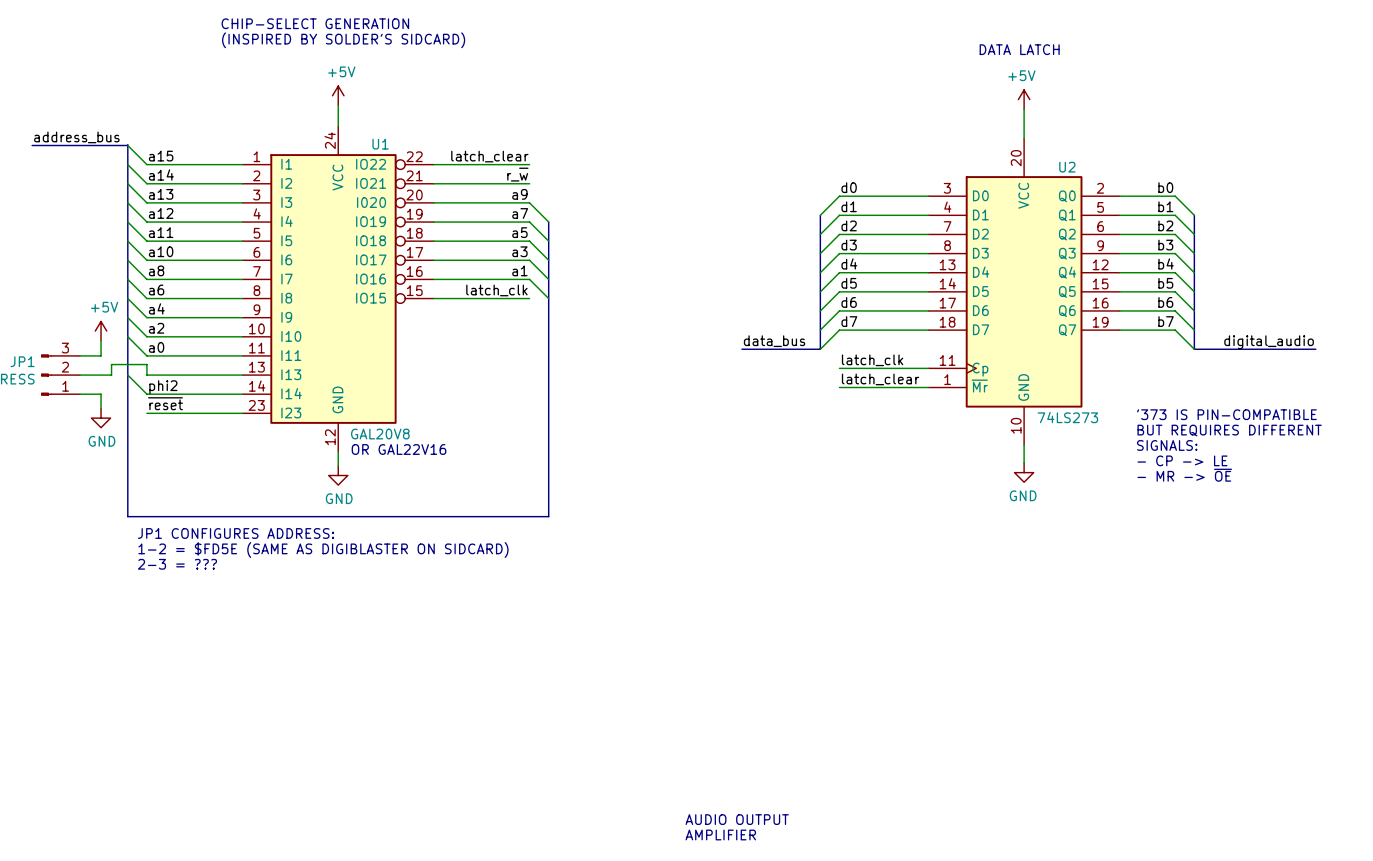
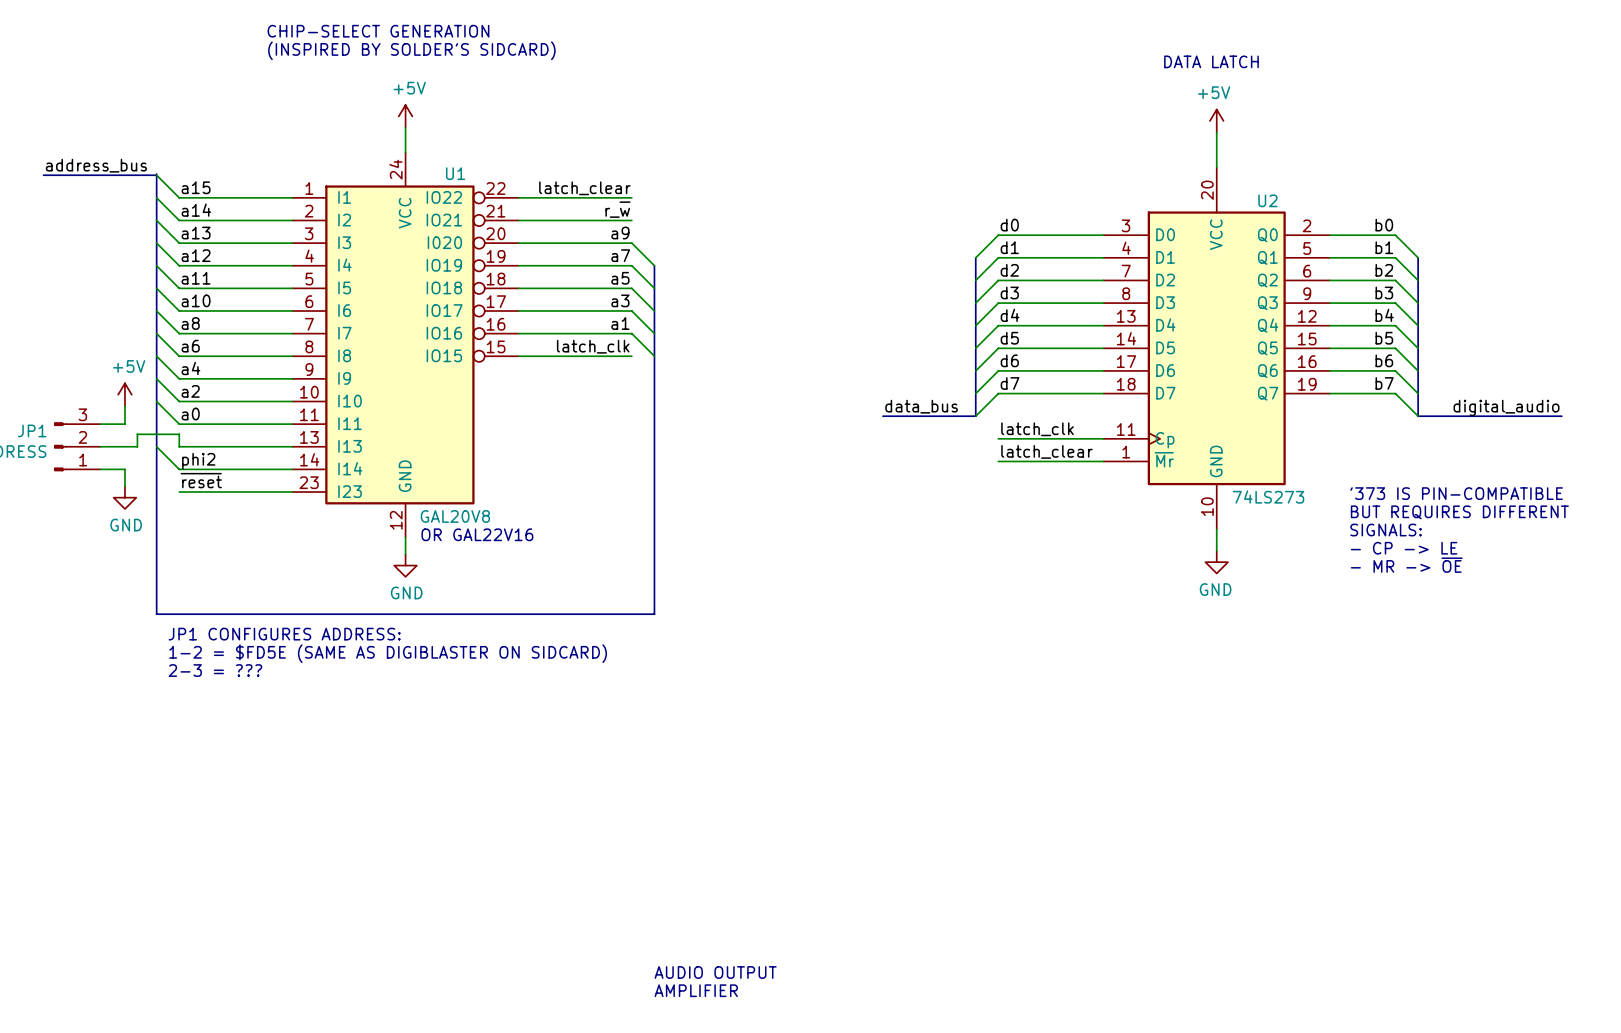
text position: AUDIO OUTPUT (737, 819) -> AUDIO OUTPUT (715, 972)
text position: AMPLIFIER (720, 834) -> AMPLIFIER (696, 990)

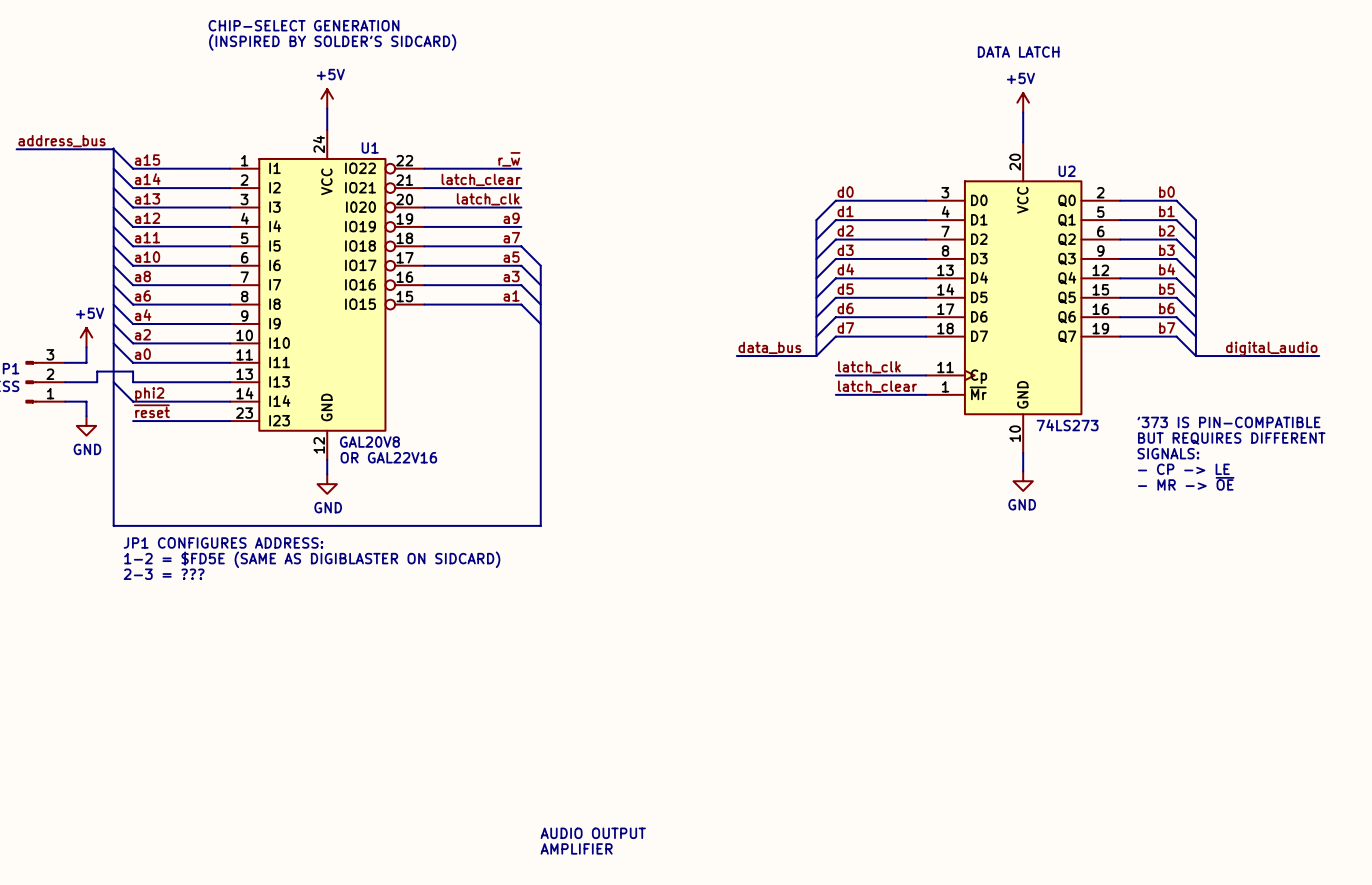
label: latch_clear (584, 188) -> r_~{w} (509, 159)
label: r_~{w} (617, 209) -> latch_clear (481, 179)
label: a9 (620, 233) -> latch_clk (488, 199)
wire: (631, 243) (654, 265) -> none
label: a7 (620, 255) -> a9 (511, 218)
wire: (631, 265) (654, 288) -> (521, 304) (540, 323)
bus: (654, 265) (654, 310) -> none
label: a5 (620, 278) -> a7 (511, 237)
label: a3 (620, 300) -> a5 (511, 257)
label: a1 (620, 323) -> a3 (511, 276)
label: latch_clk (593, 346) -> a1 (511, 295)

